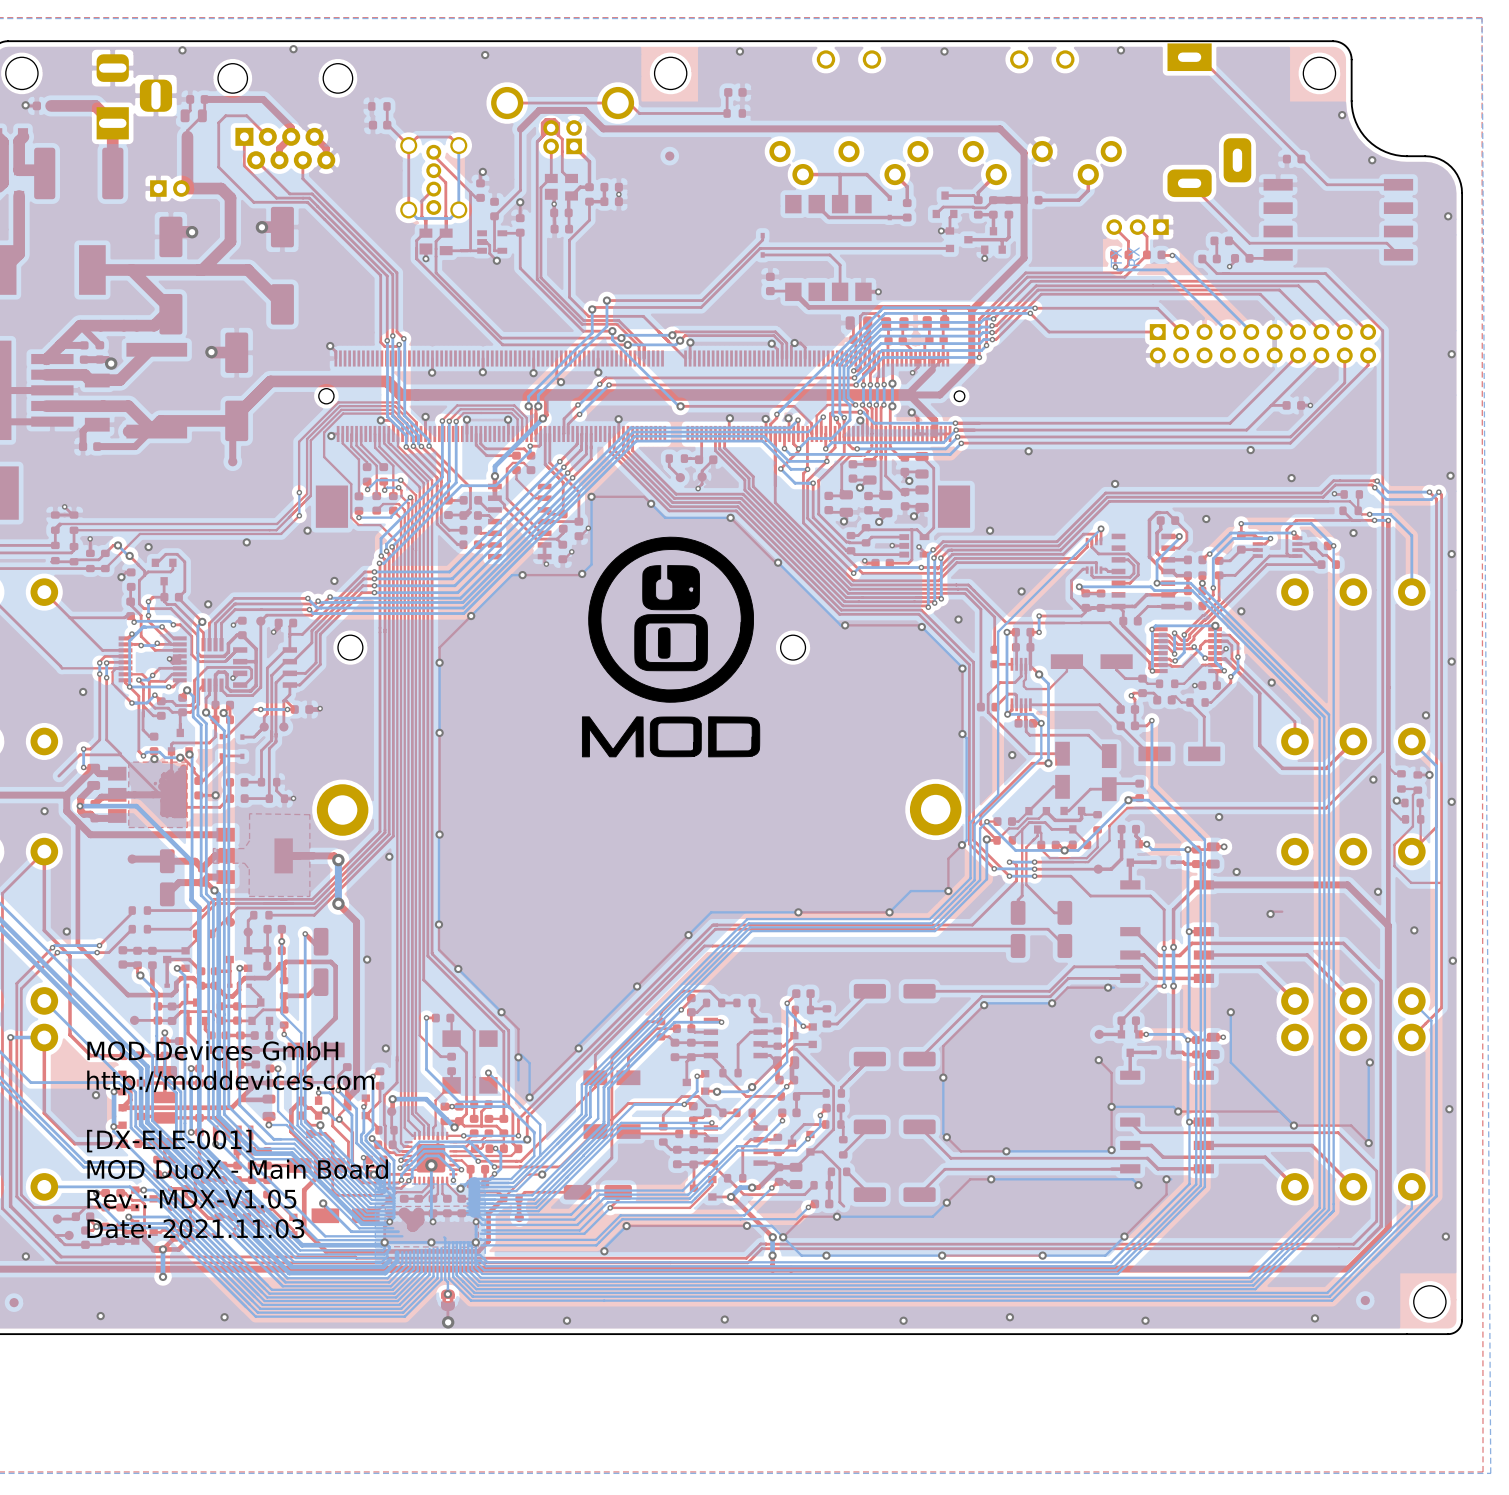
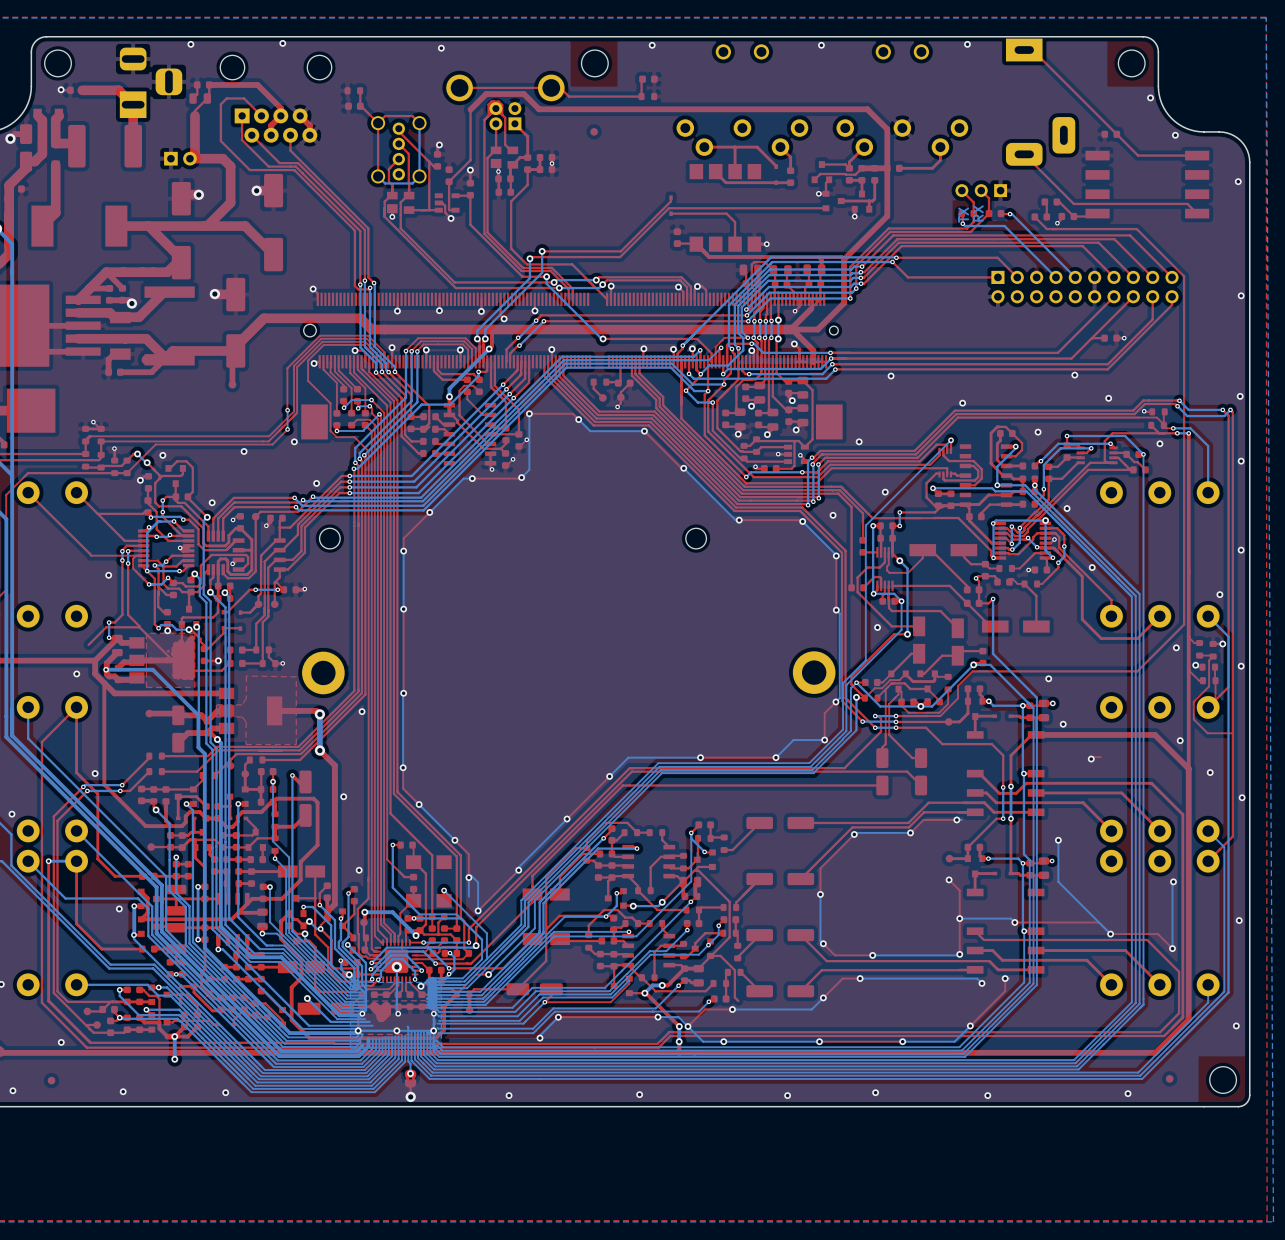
drawing: [581, 536, 761, 758] -> none
text: MOD Devices GmbH (212, 1050) -> none
text: http://moddevices.com (230, 1082) -> none
text: [DX-ELE-001] (169, 1141) -> none
text: MOD DuoX - Main Board (237, 1169) -> none
text: Rev.: MDX-V1.05 (191, 1199) -> none
text: Date: 2021.11.03 (195, 1228) -> none

